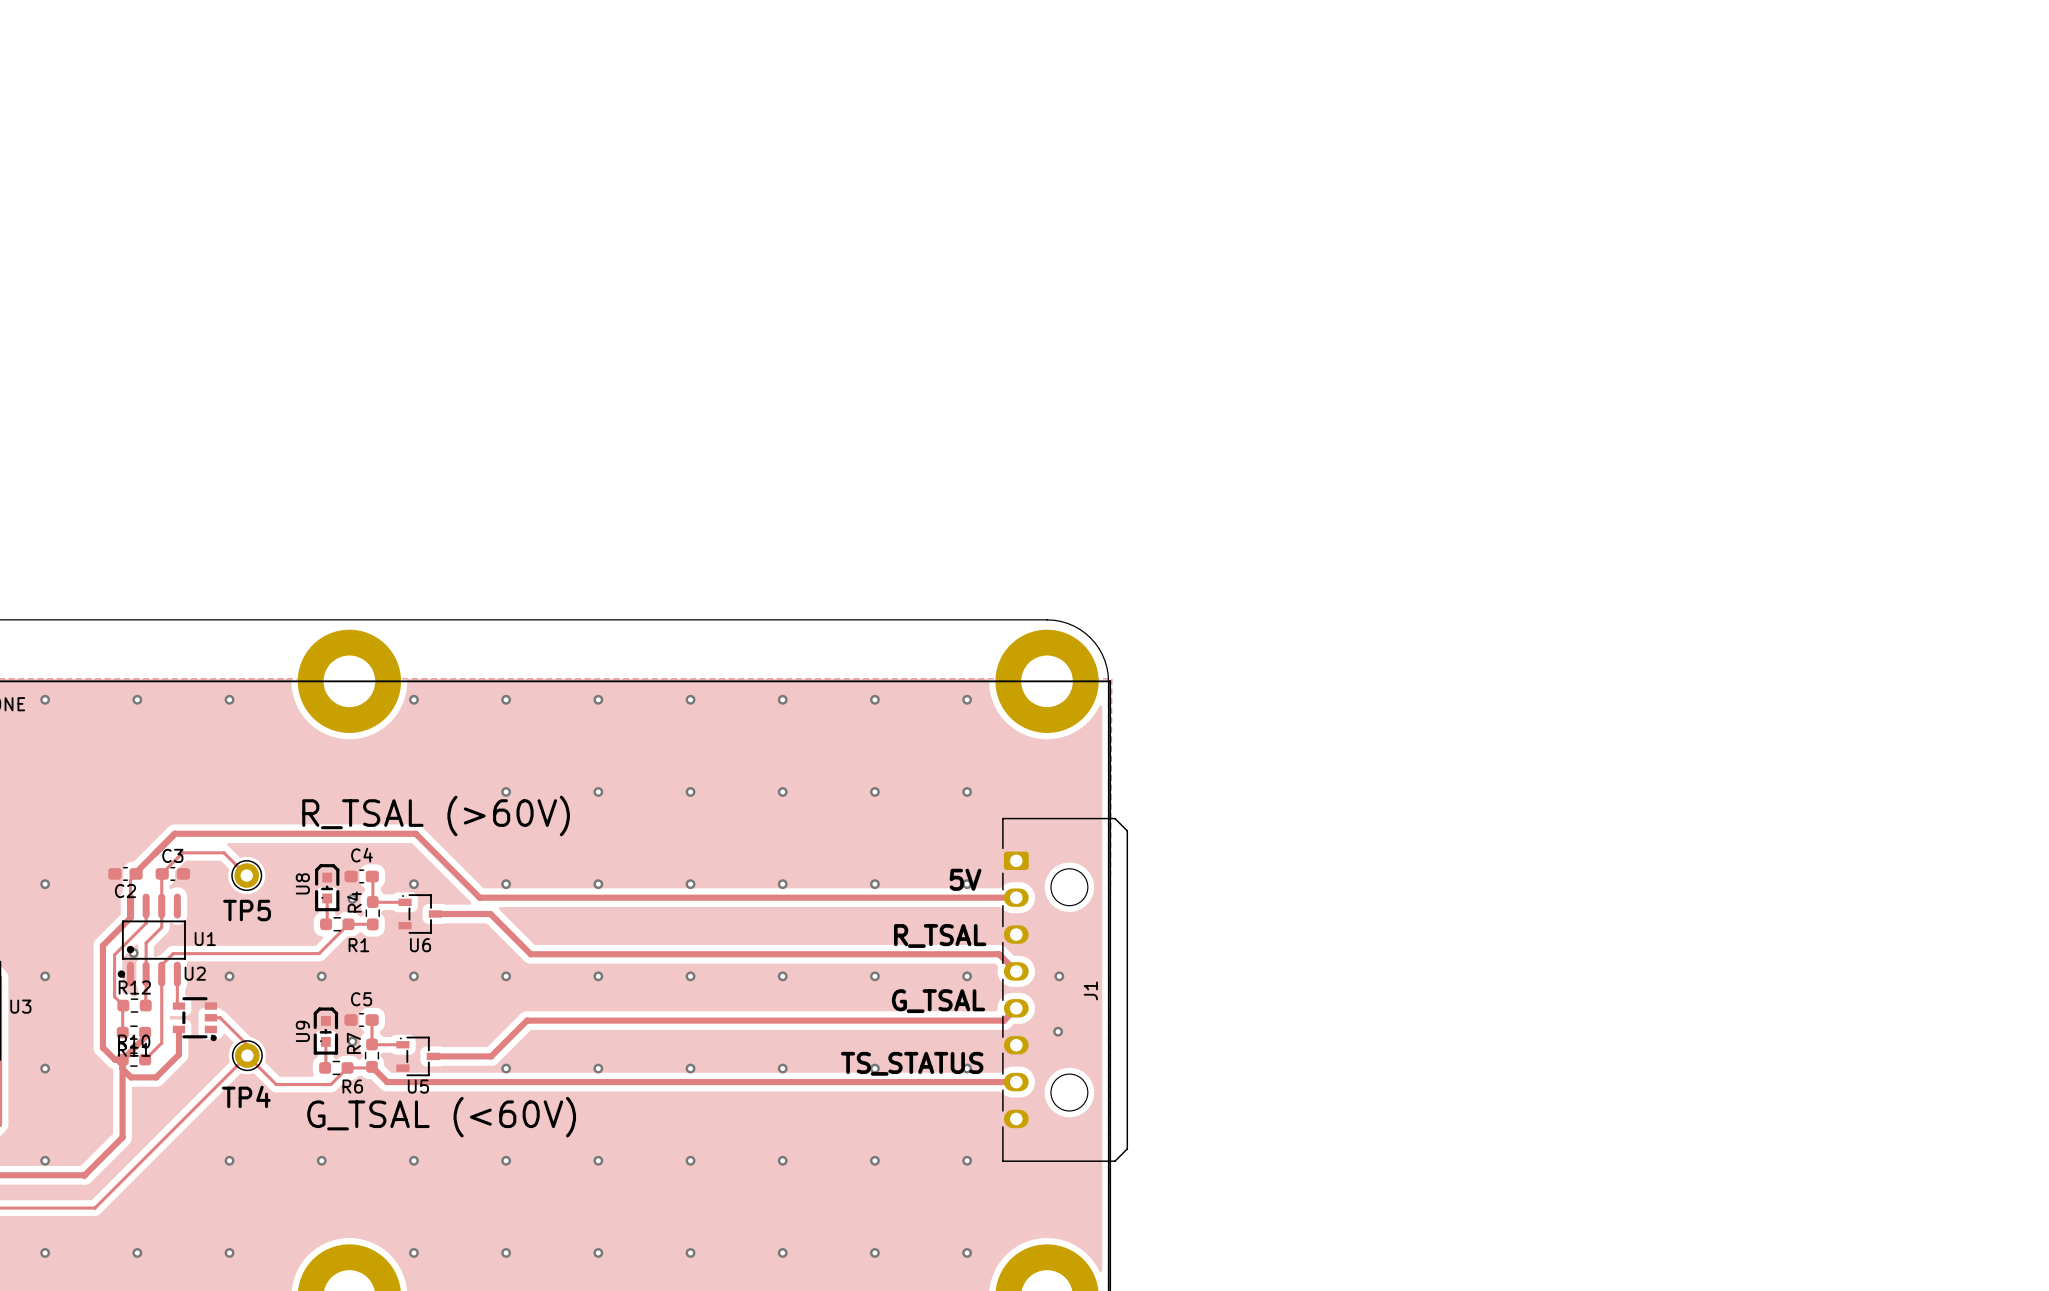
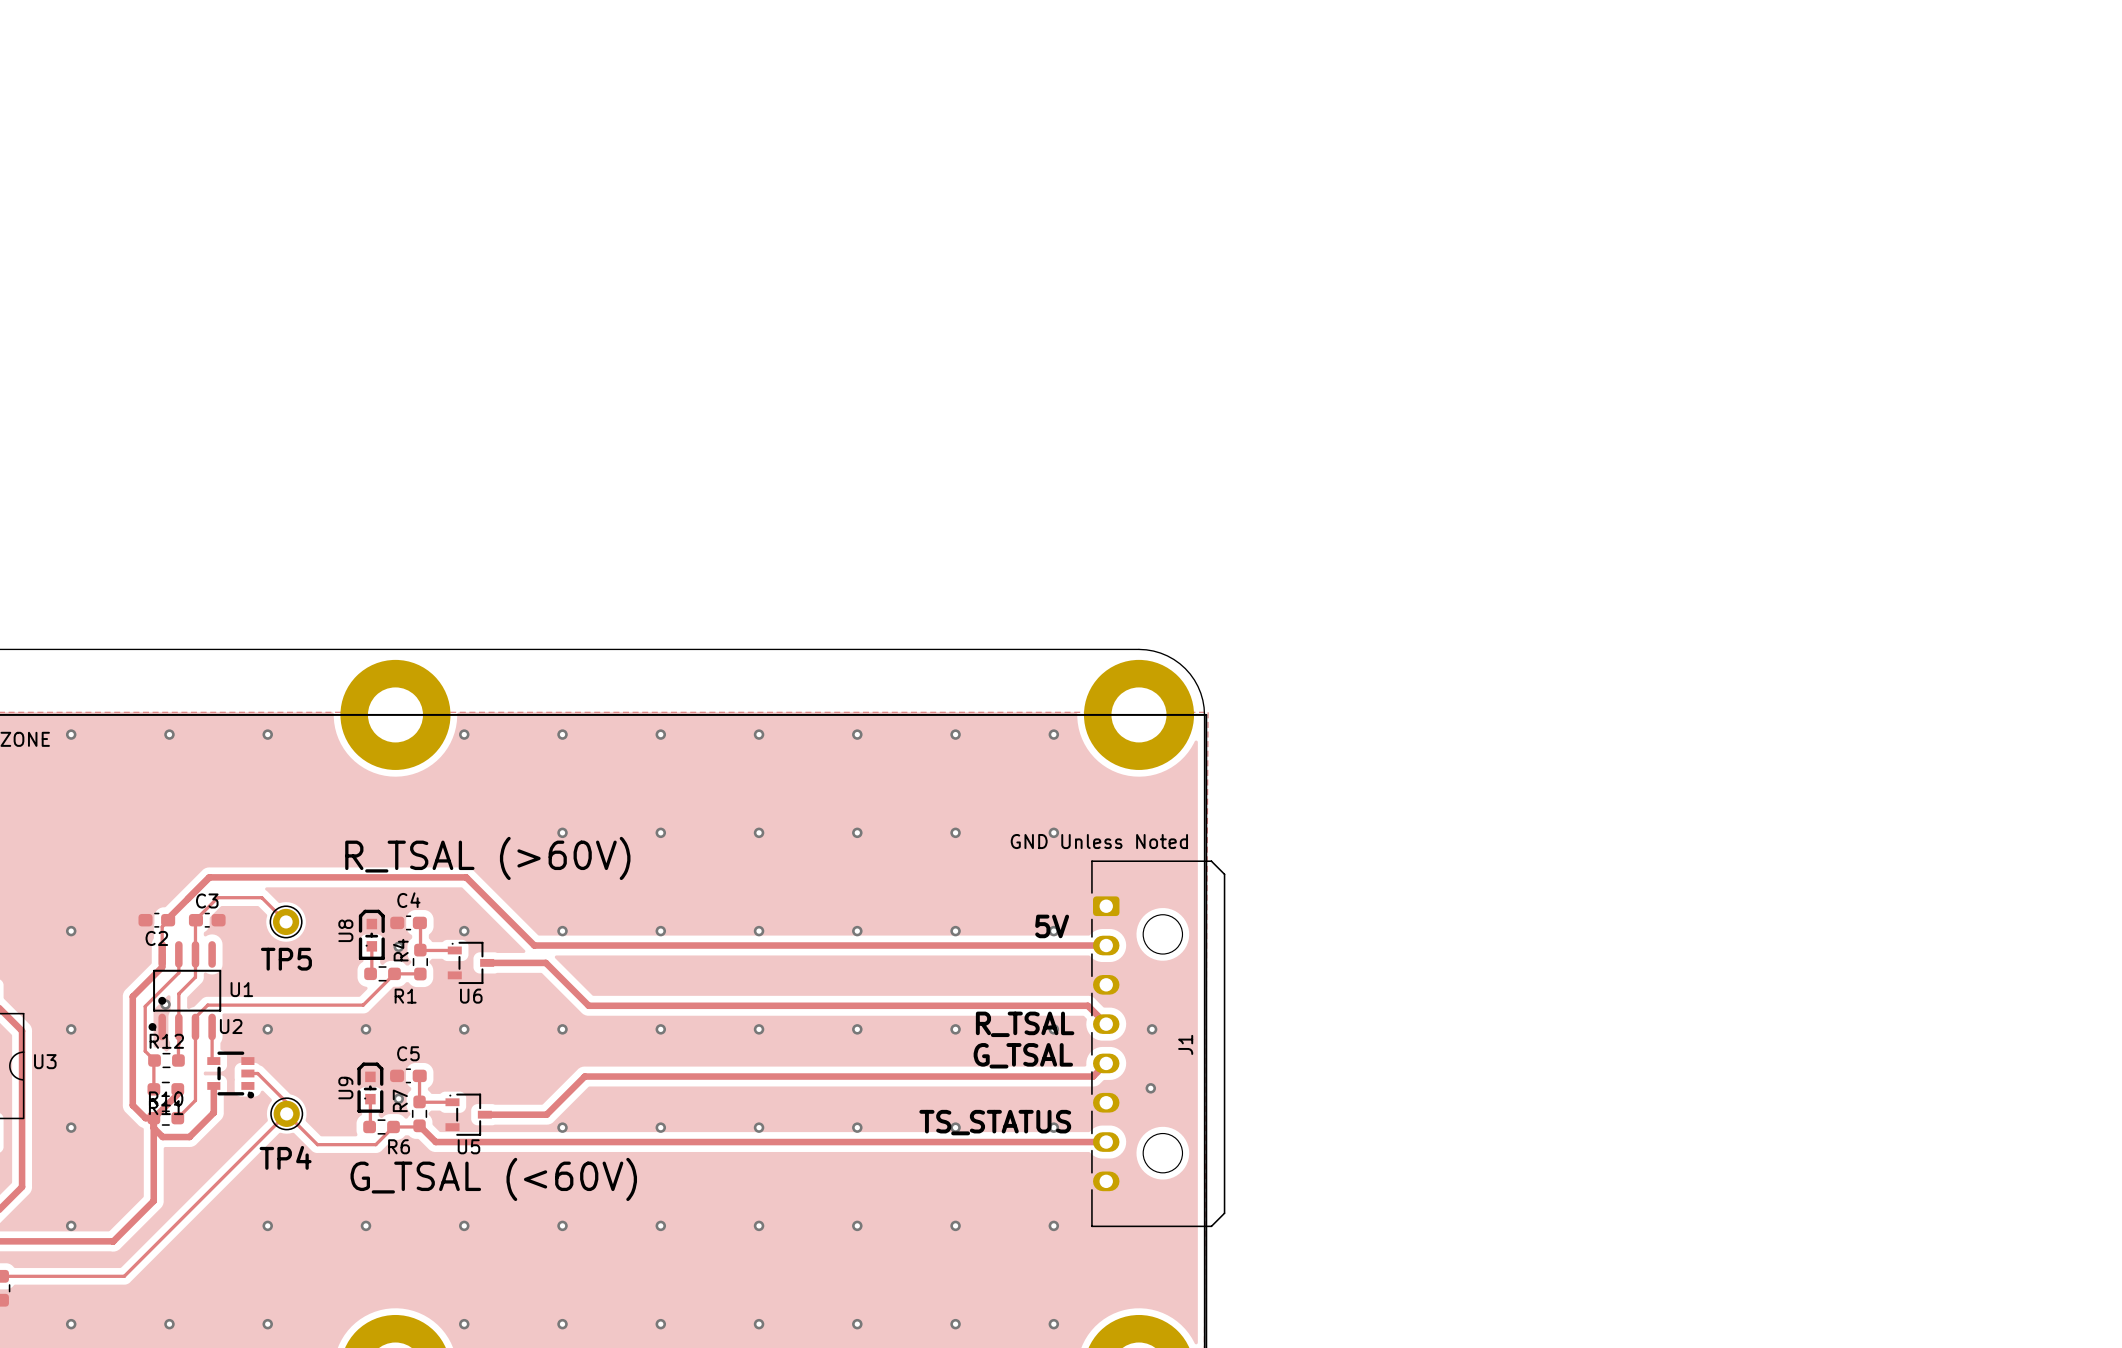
text: none -> GND Unless Noted (1099, 841)
text position: R_TSAL (940, 935) -> R_TSAL (1025, 1024)

